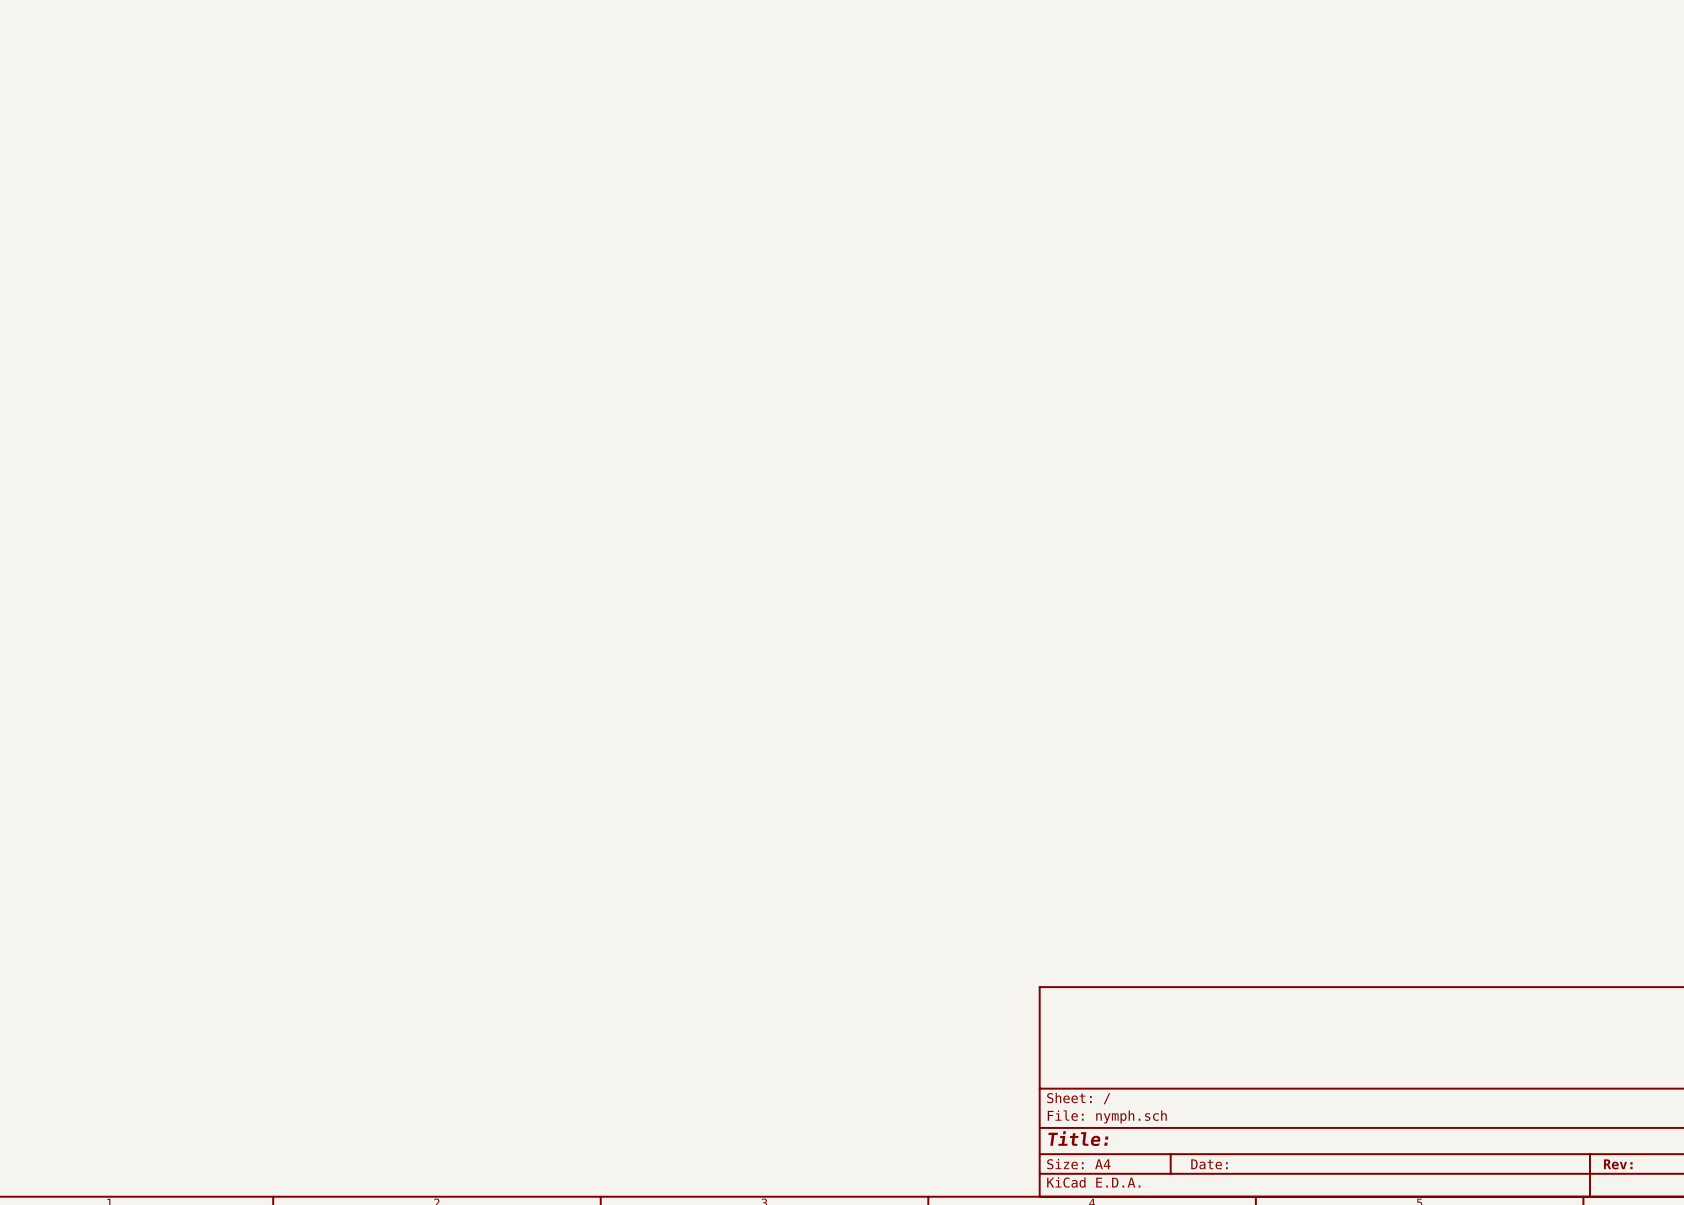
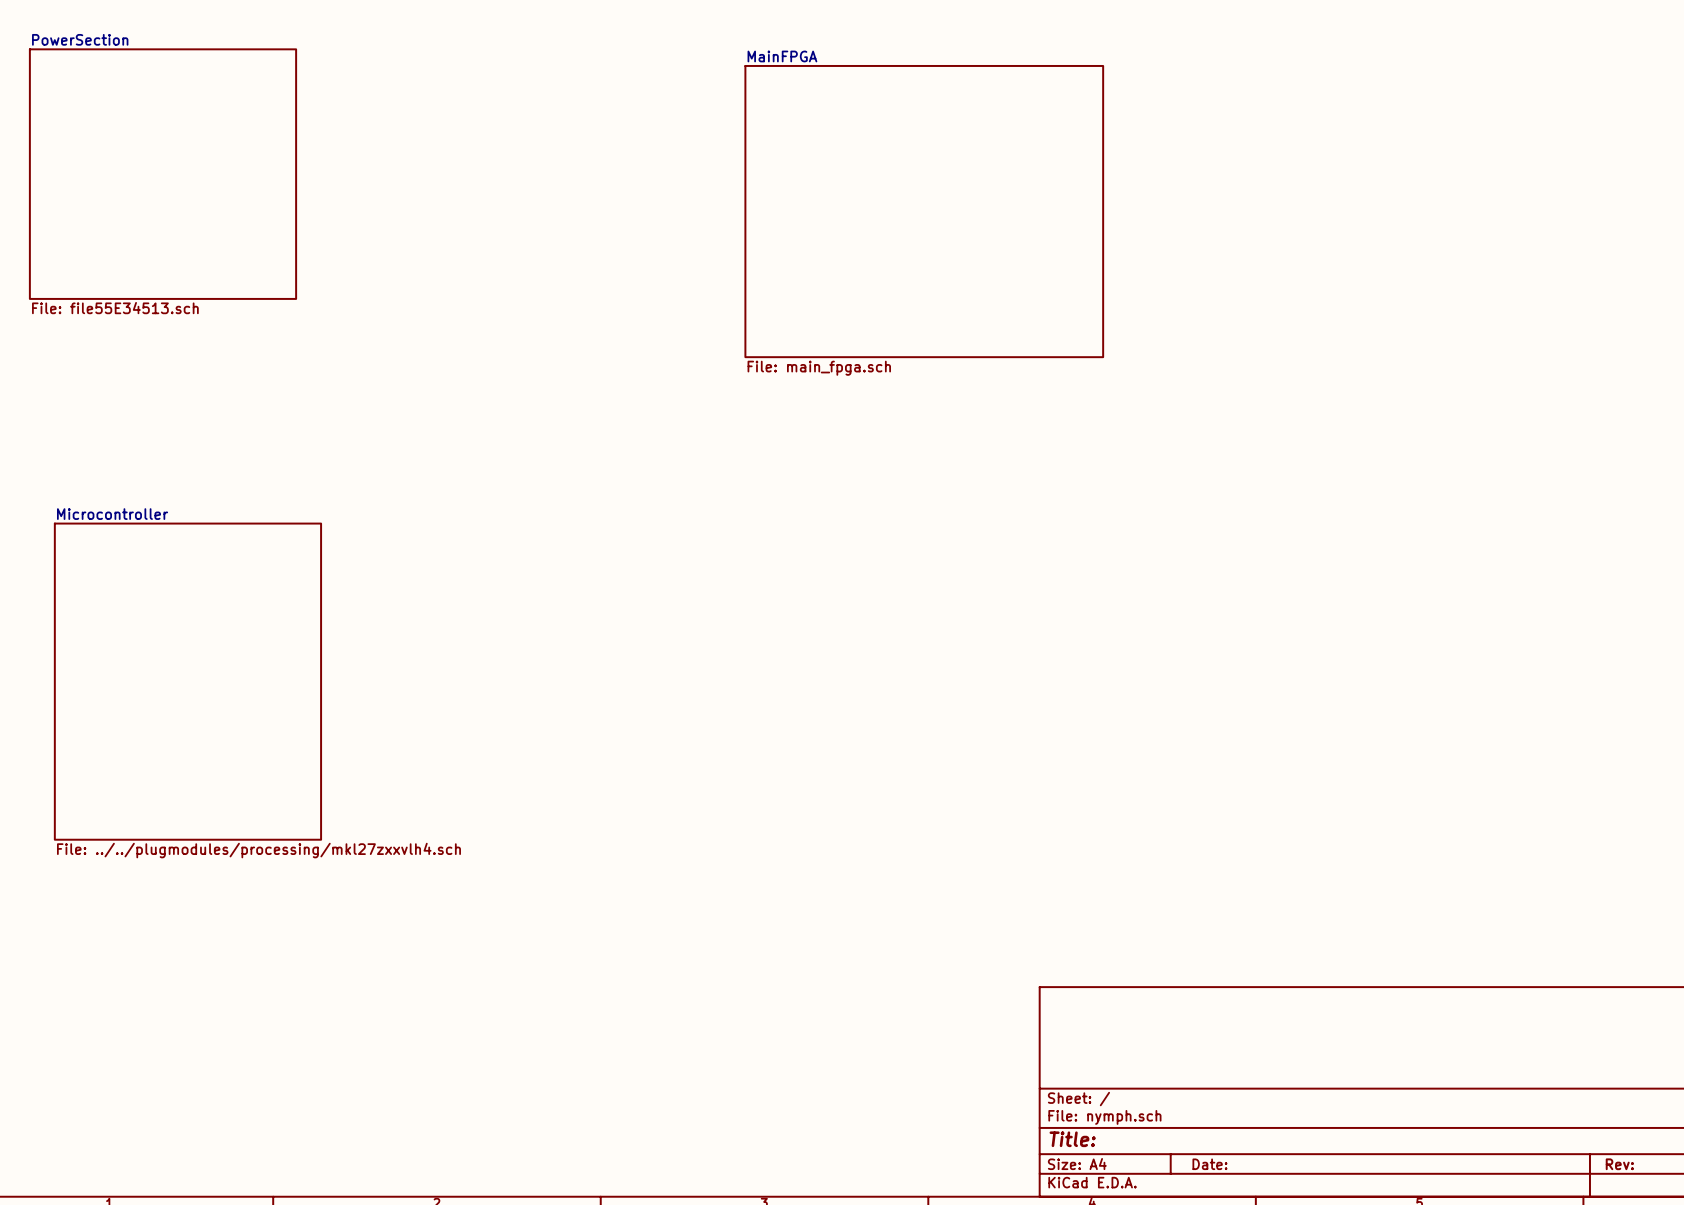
sheet PowerSection: none -> File: file55E34513.sch (163, 174)
sheet MainFPGA: none -> File: main_fpga.sch (924, 211)
sheet Microcontroller: none -> File: ../../plugmodules/processing/mkl27zxxvlh4.sch (187, 681)

